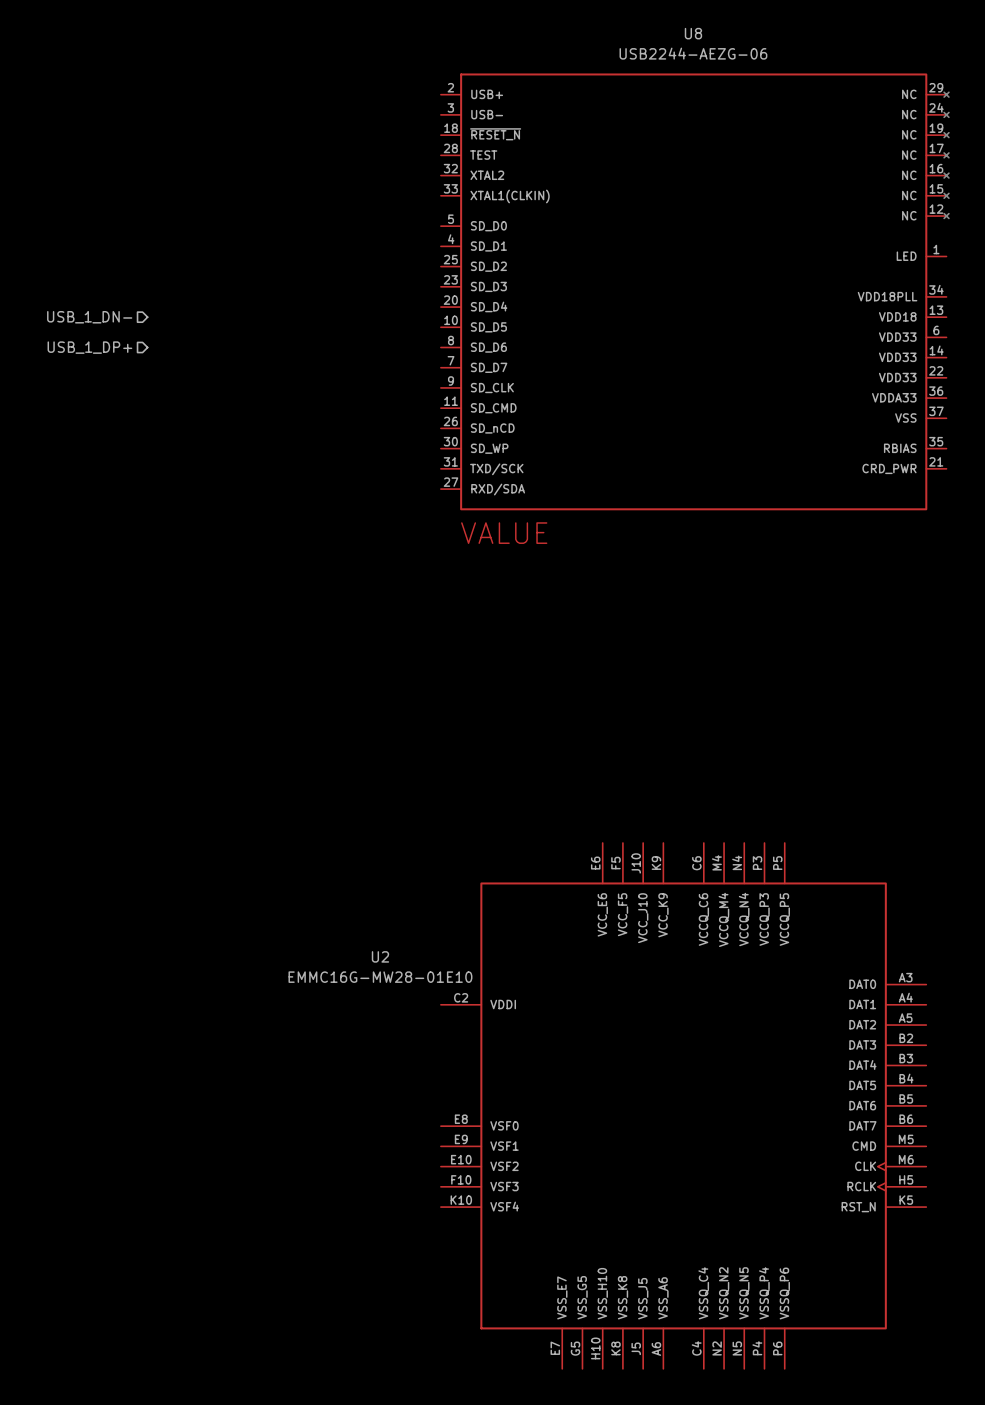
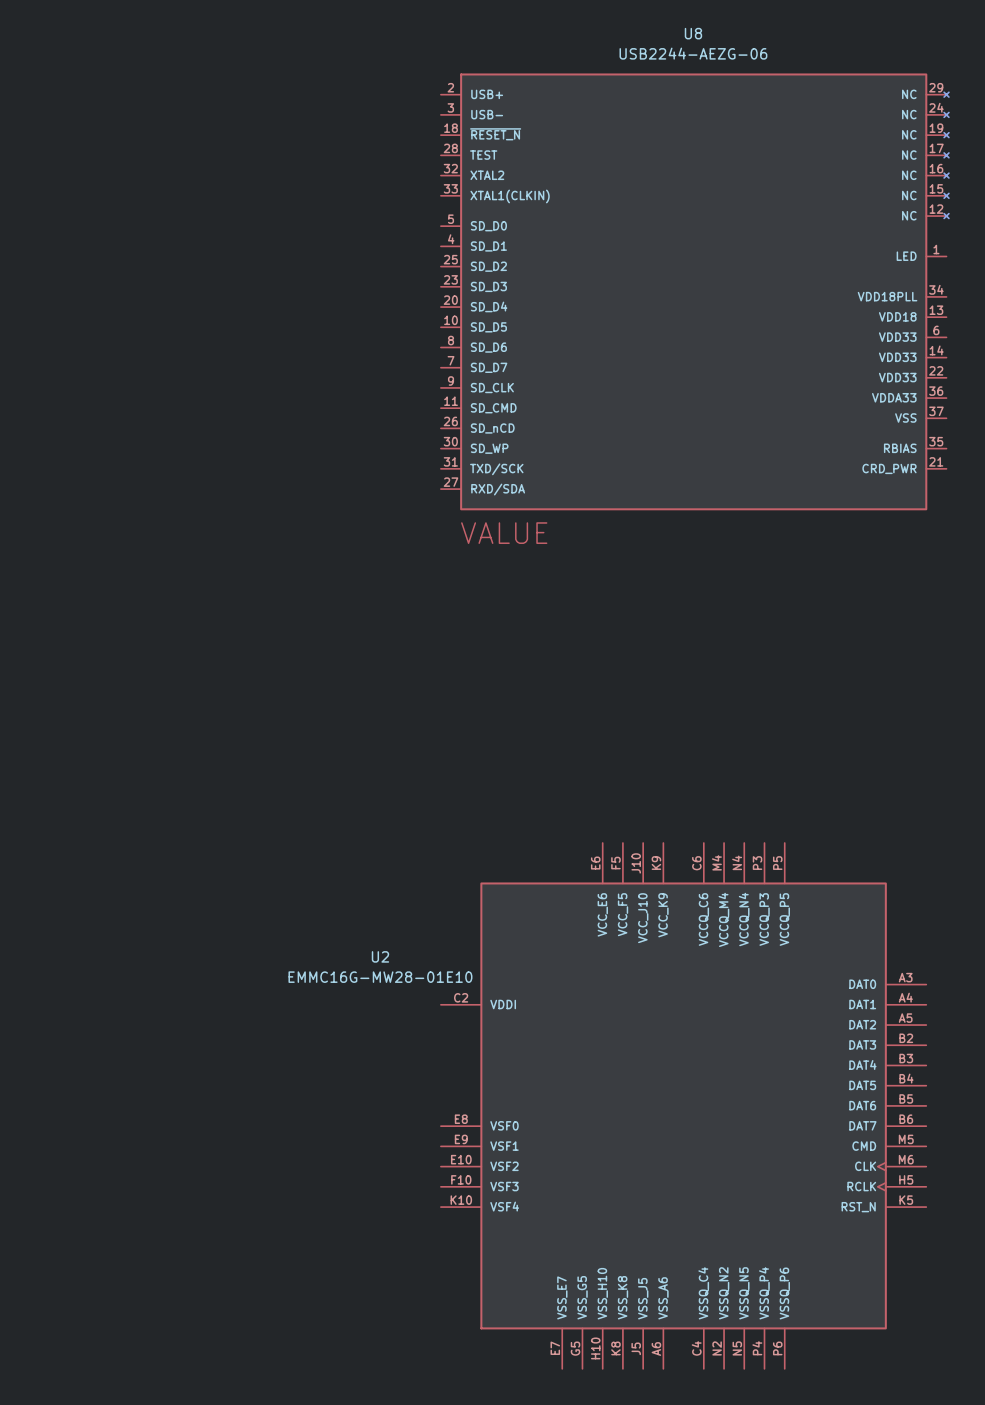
hierarchical label: USB_1_DN- (89, 317) -> none
hierarchical label: USB_1_DP+ (89, 347) -> none

